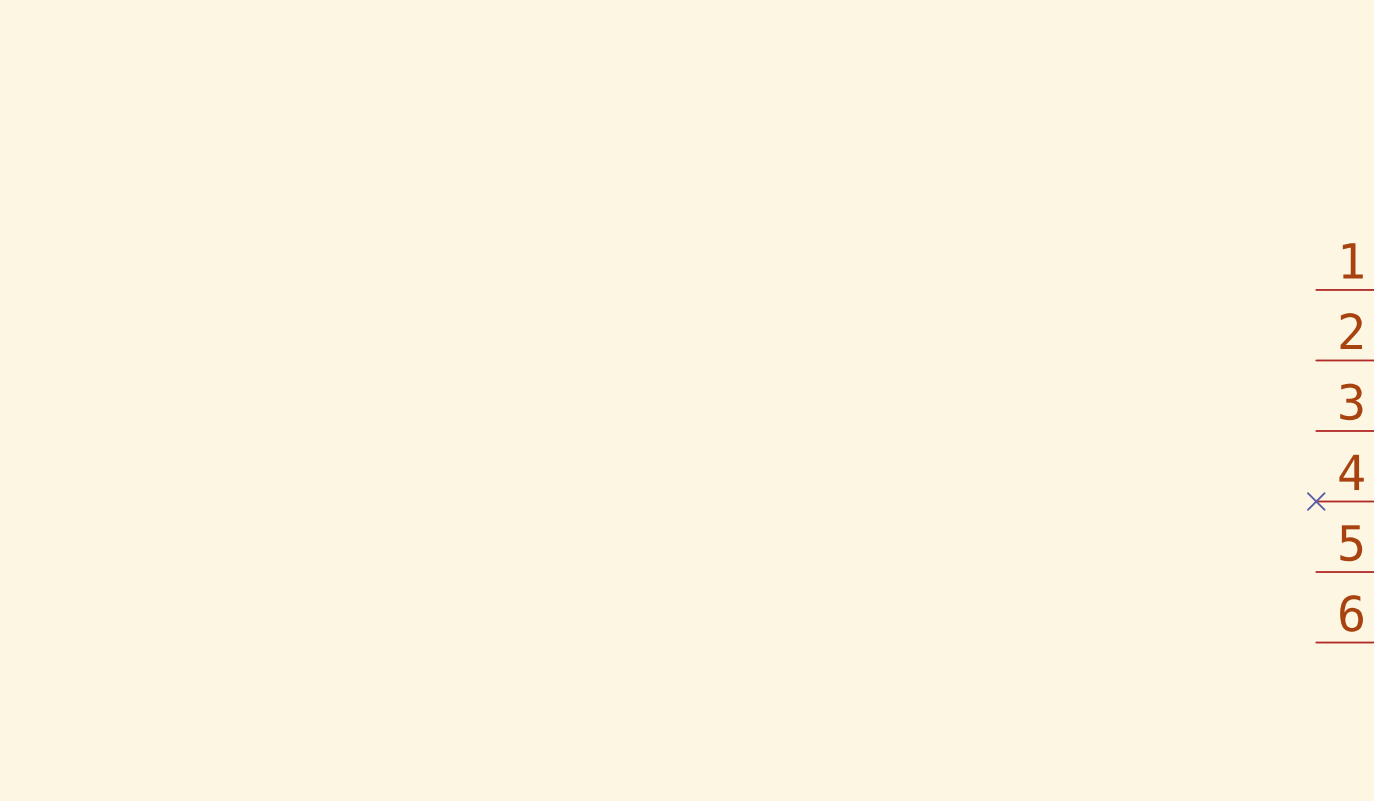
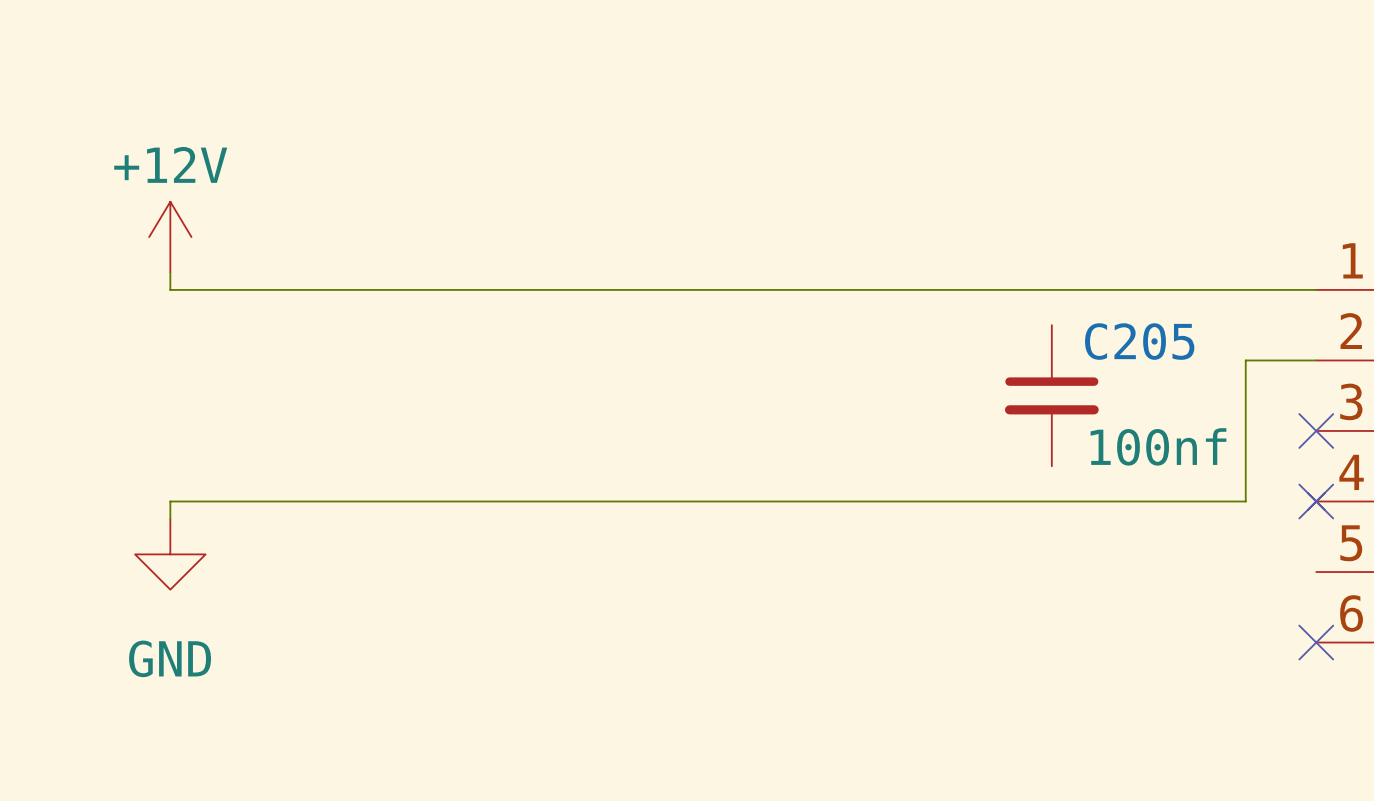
power symbol: none -> +12V (170, 237)
wire: none -> (170, 272) (170, 289) (1316, 289)
wire: none -> (1316, 360) (1245, 360) (1245, 501) (170, 501) (170, 519)
C205: none -> 100nf (1051, 395)
no-connect mark: none -> (1316, 430)
no-connect mark: none -> (1316, 501)
power symbol: none -> GND (170, 554)
no-connect mark: none -> (1316, 642)

